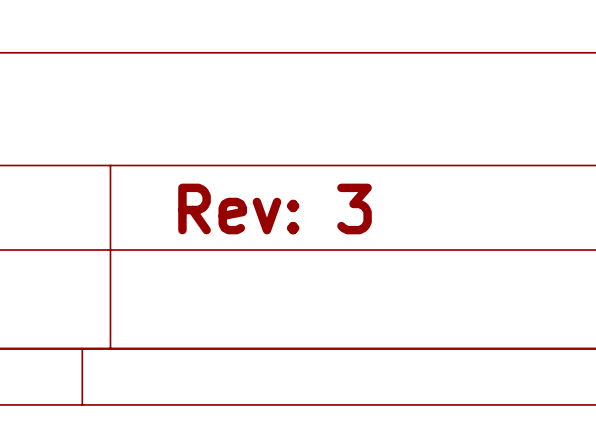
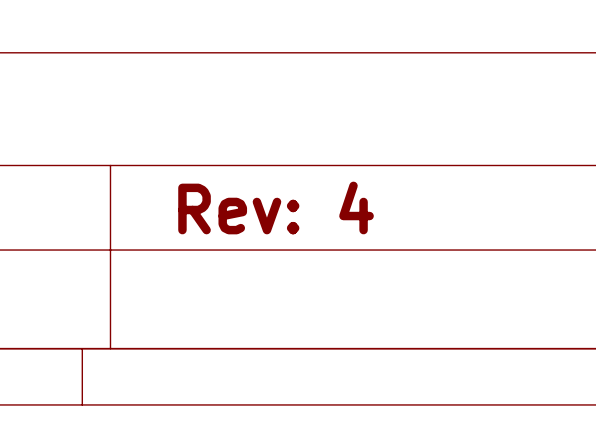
title block: Rev: 3 (275, 208) -> Rev: 4 (276, 207)

